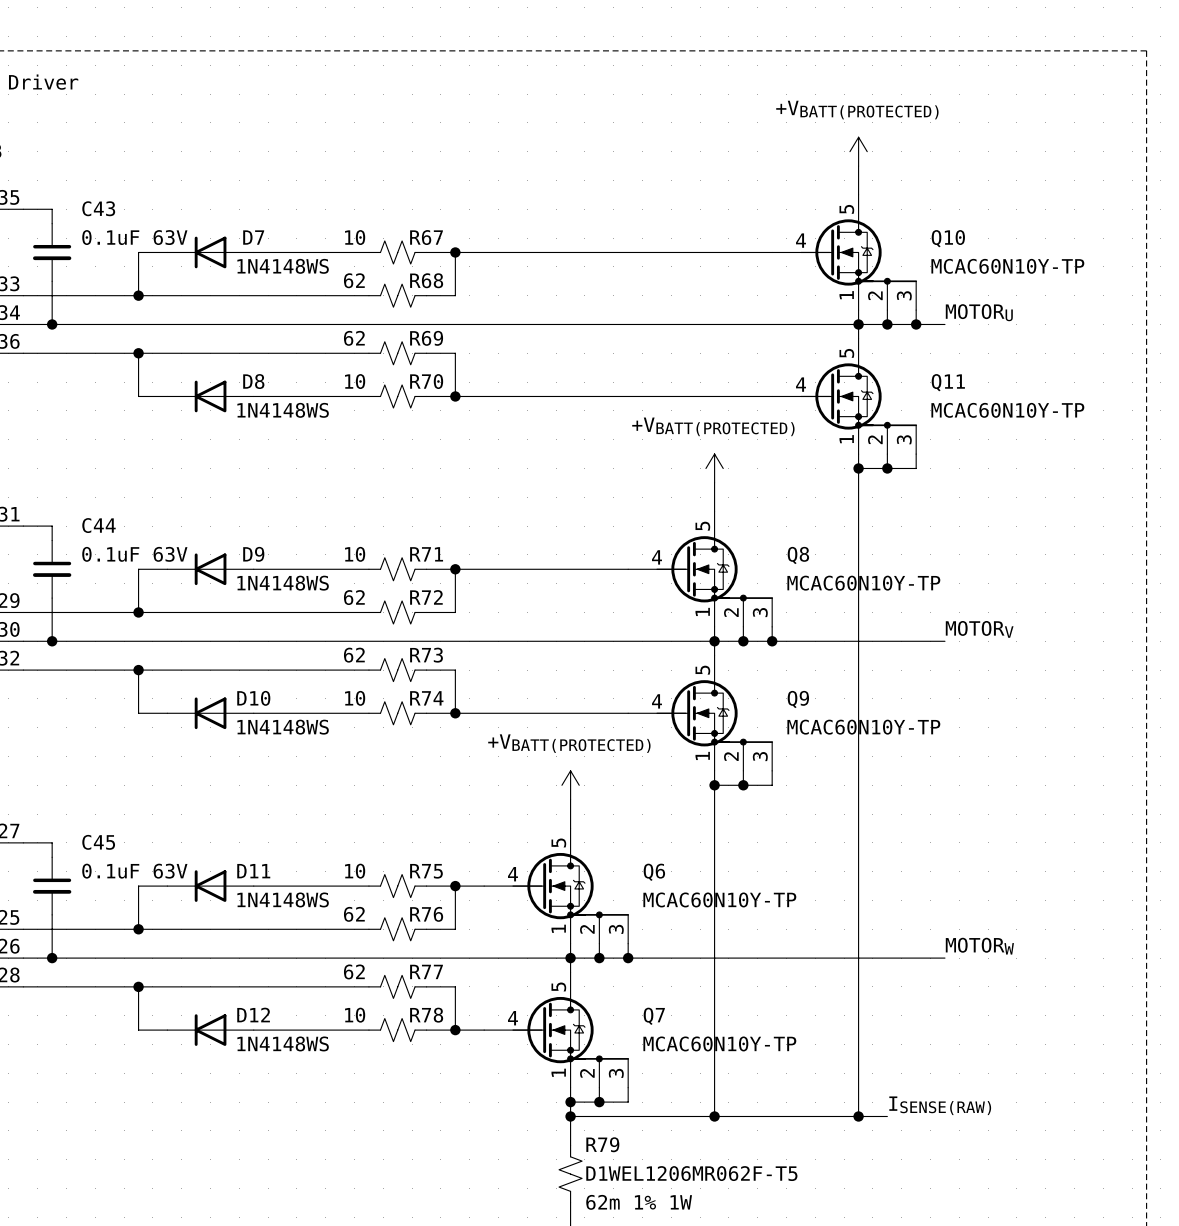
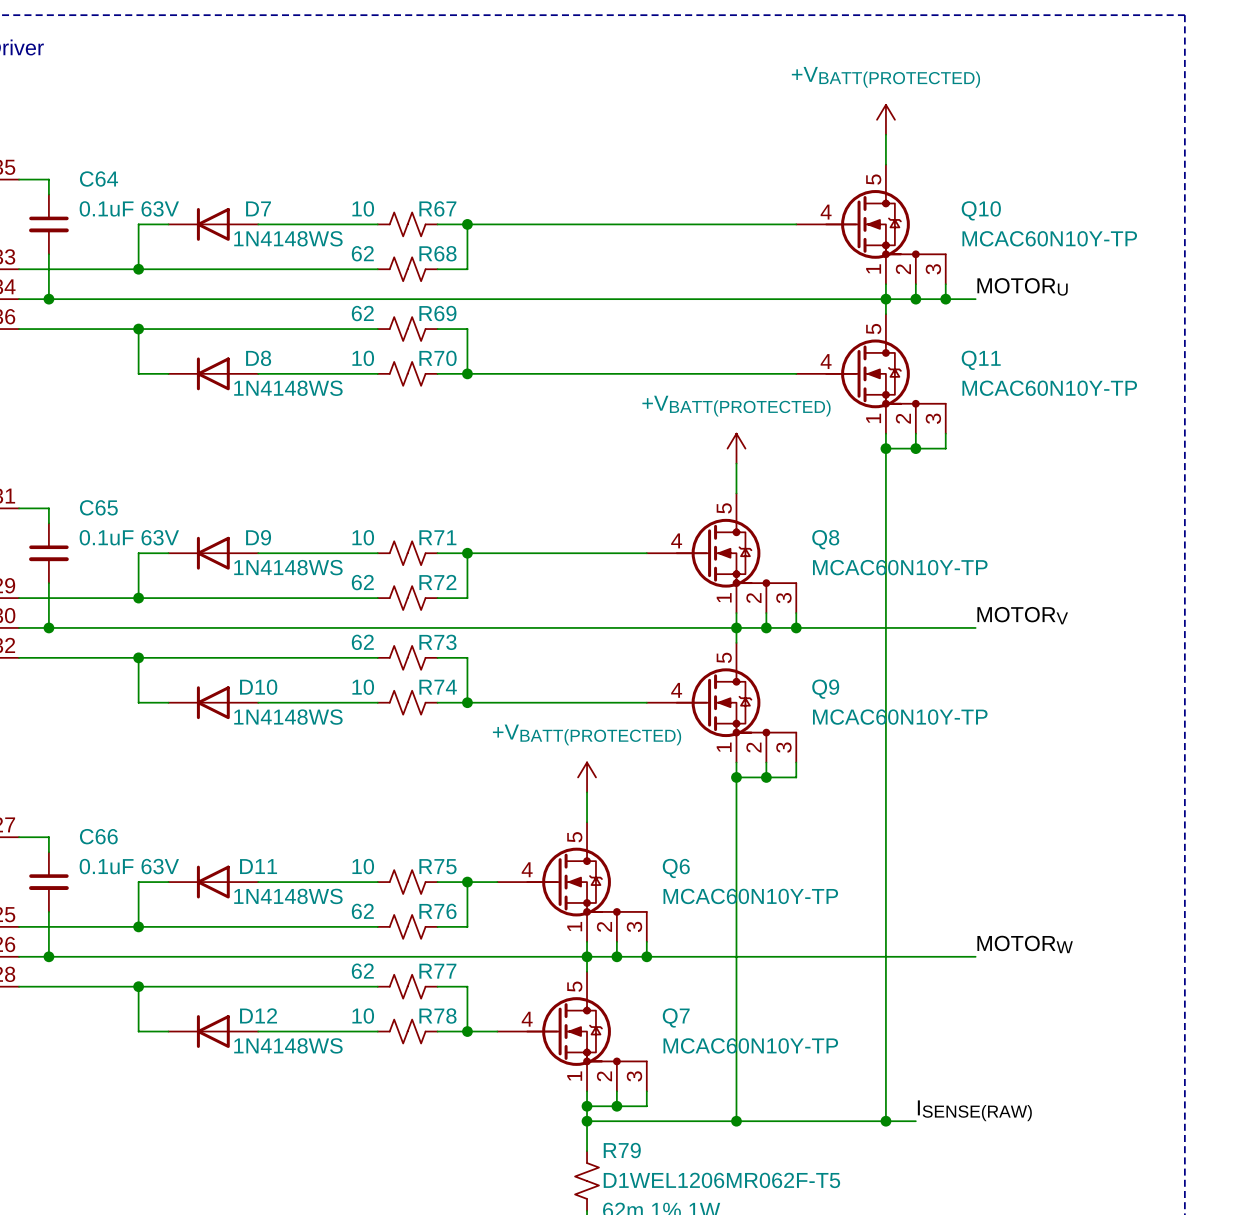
C43 name: C43 (98, 208) -> C64 (98, 179)
C44 name: C44 (99, 525) -> C65 (98, 507)
C45 name: C45 (98, 842) -> C66 (98, 836)

